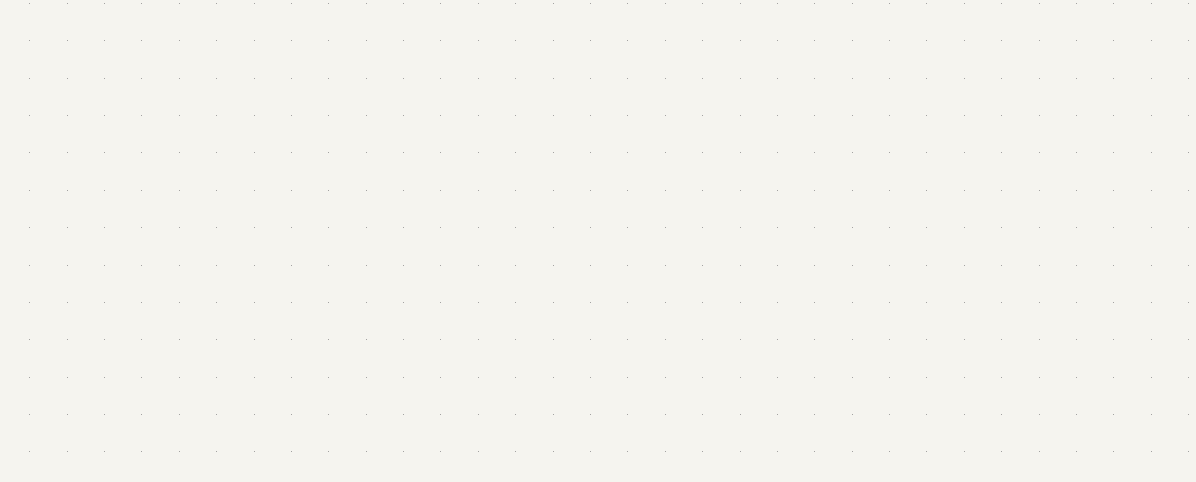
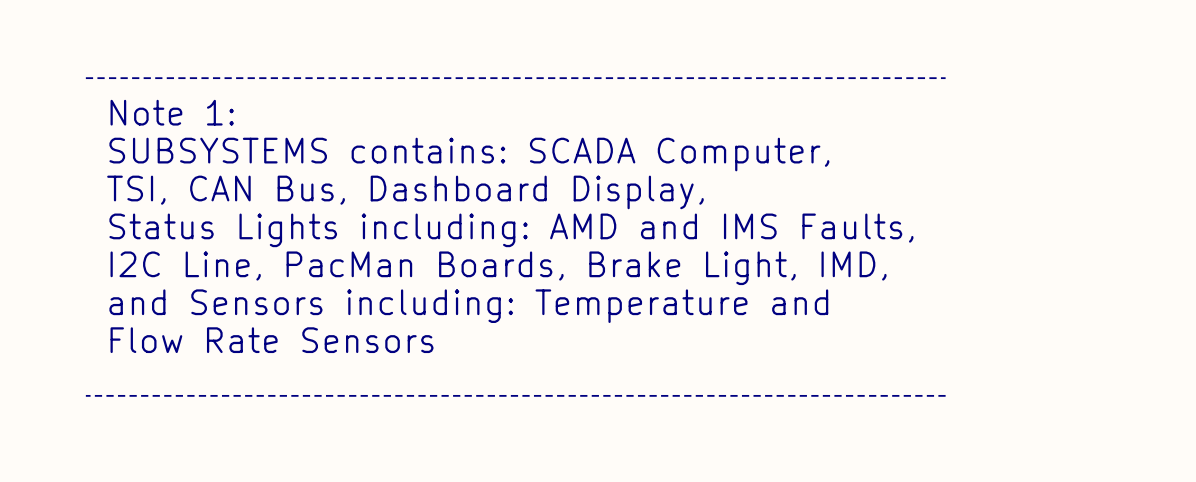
line: none -> (85, 78) (945, 78)
text: none -> Note 1: (172, 112)
text: none -> SUBSYSTEMS contains: SCADA Computer, (469, 154)
text: none -> TSI, CAN Bus, Dashboard Display, (405, 192)
text: none -> Status Lights including: AMD and IMS Faults, (511, 230)
text: none -> I2C Line, PacMan Boards, Brake Light, IMD, (498, 268)
text: none -> and Sensors including: Temperature and (468, 306)
text: none -> Flow Rate Sensors (272, 340)
line: none -> (85, 395) (945, 395)

